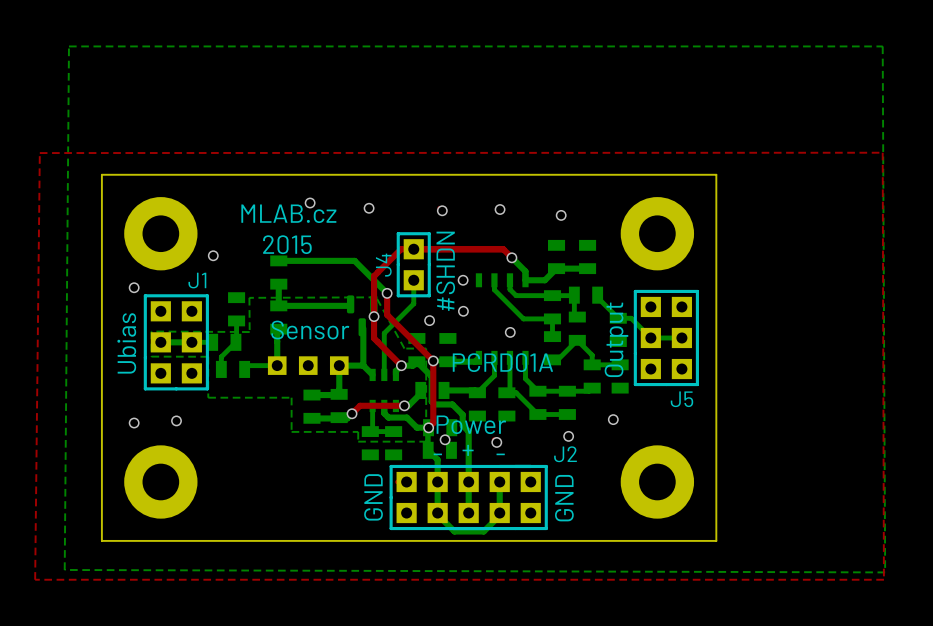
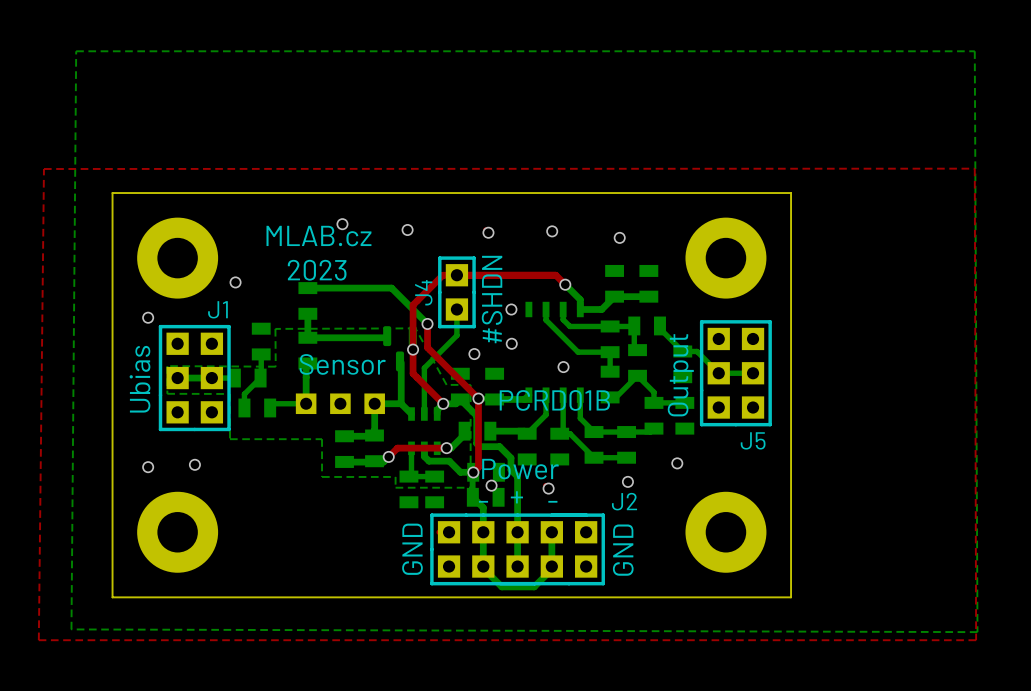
text: 2015 (287, 244) -> 2023 (317, 270)
text: PCRD01A (502, 362) -> PCRD01B (554, 400)

